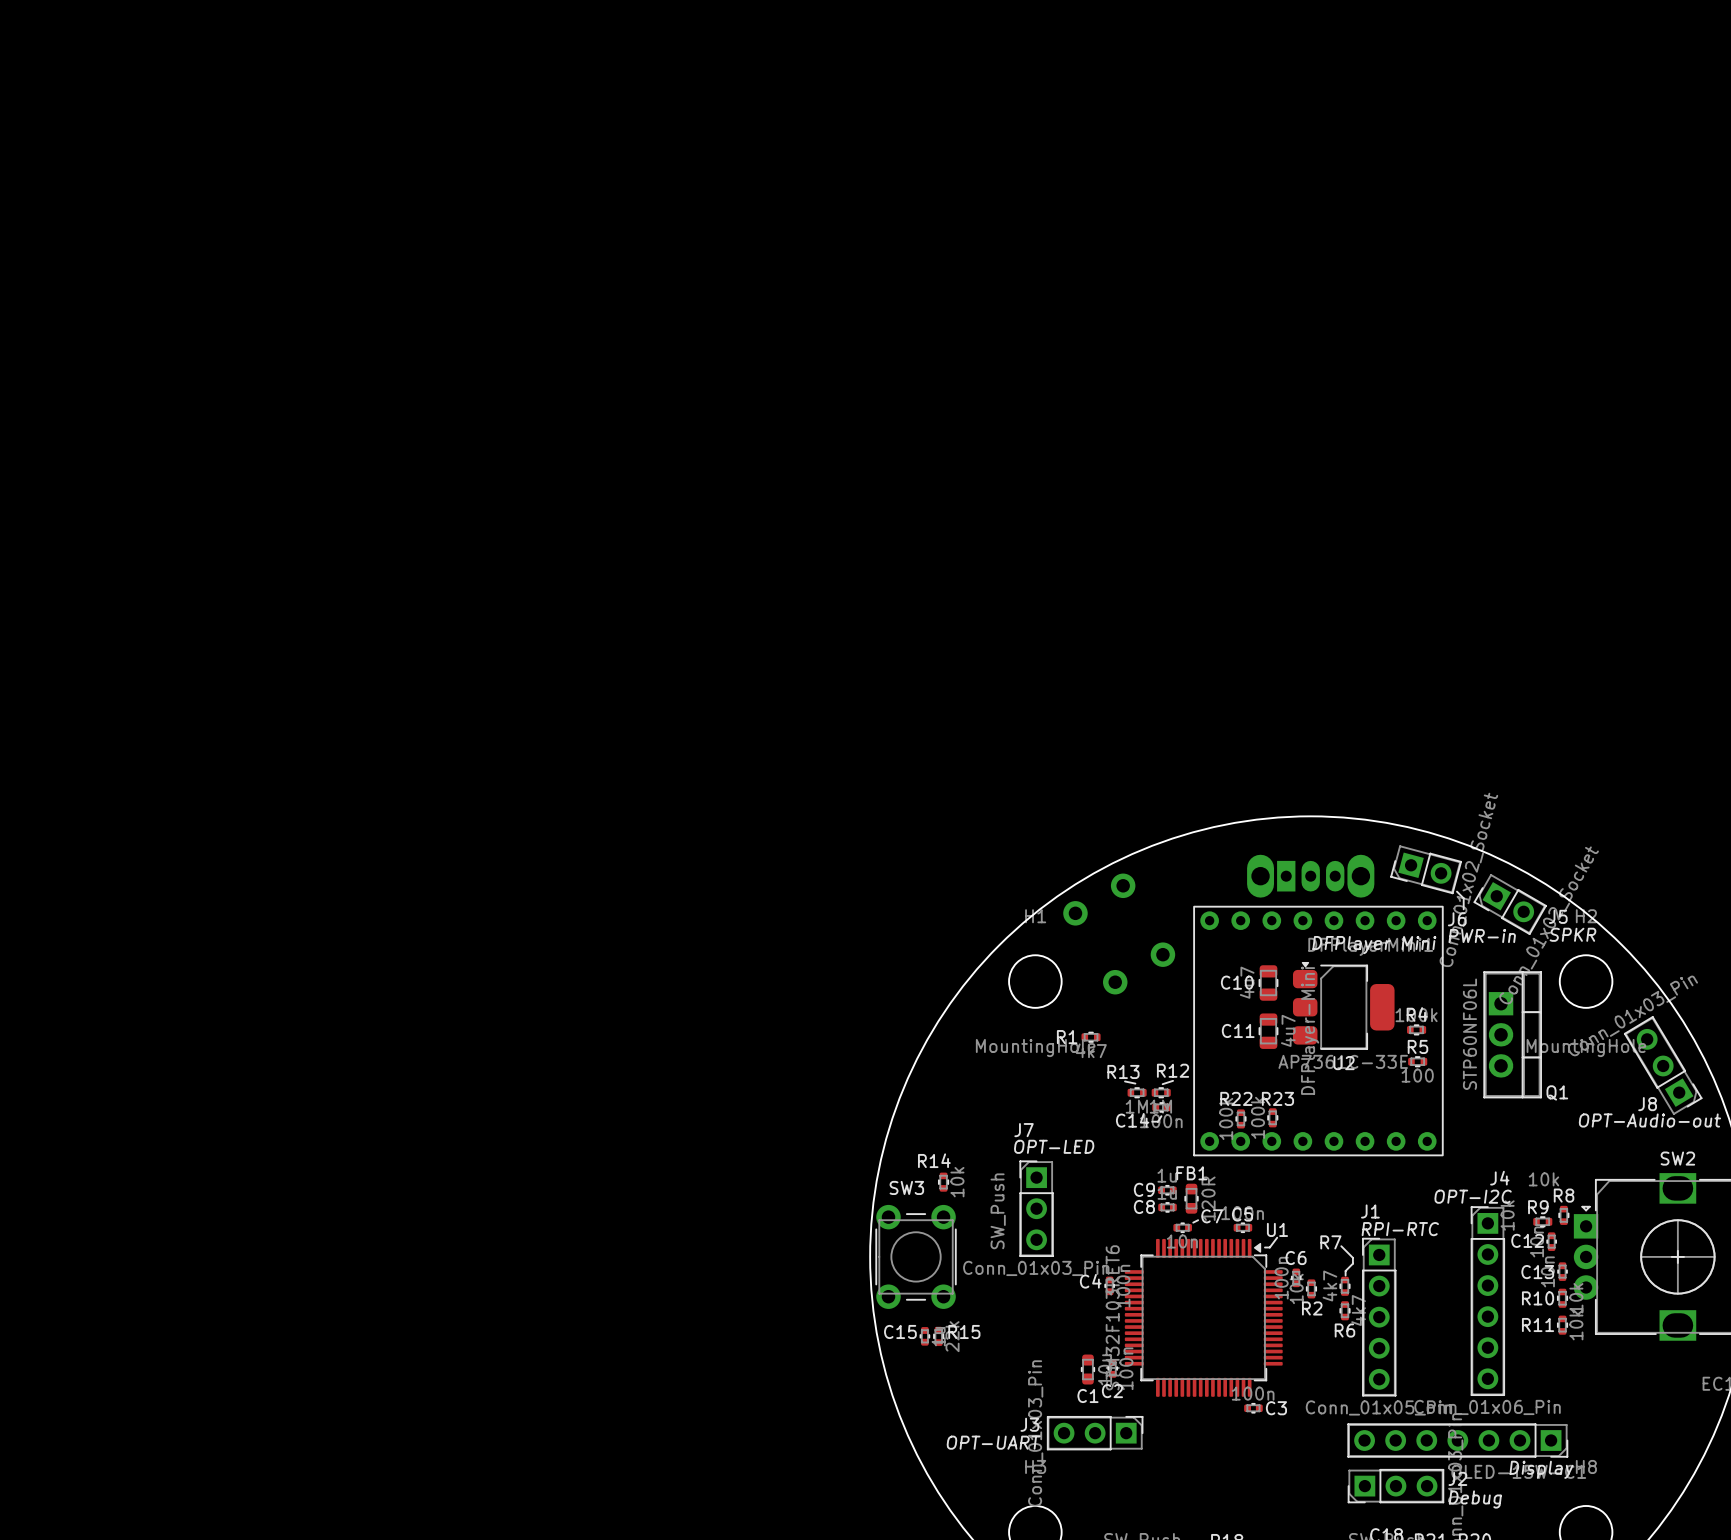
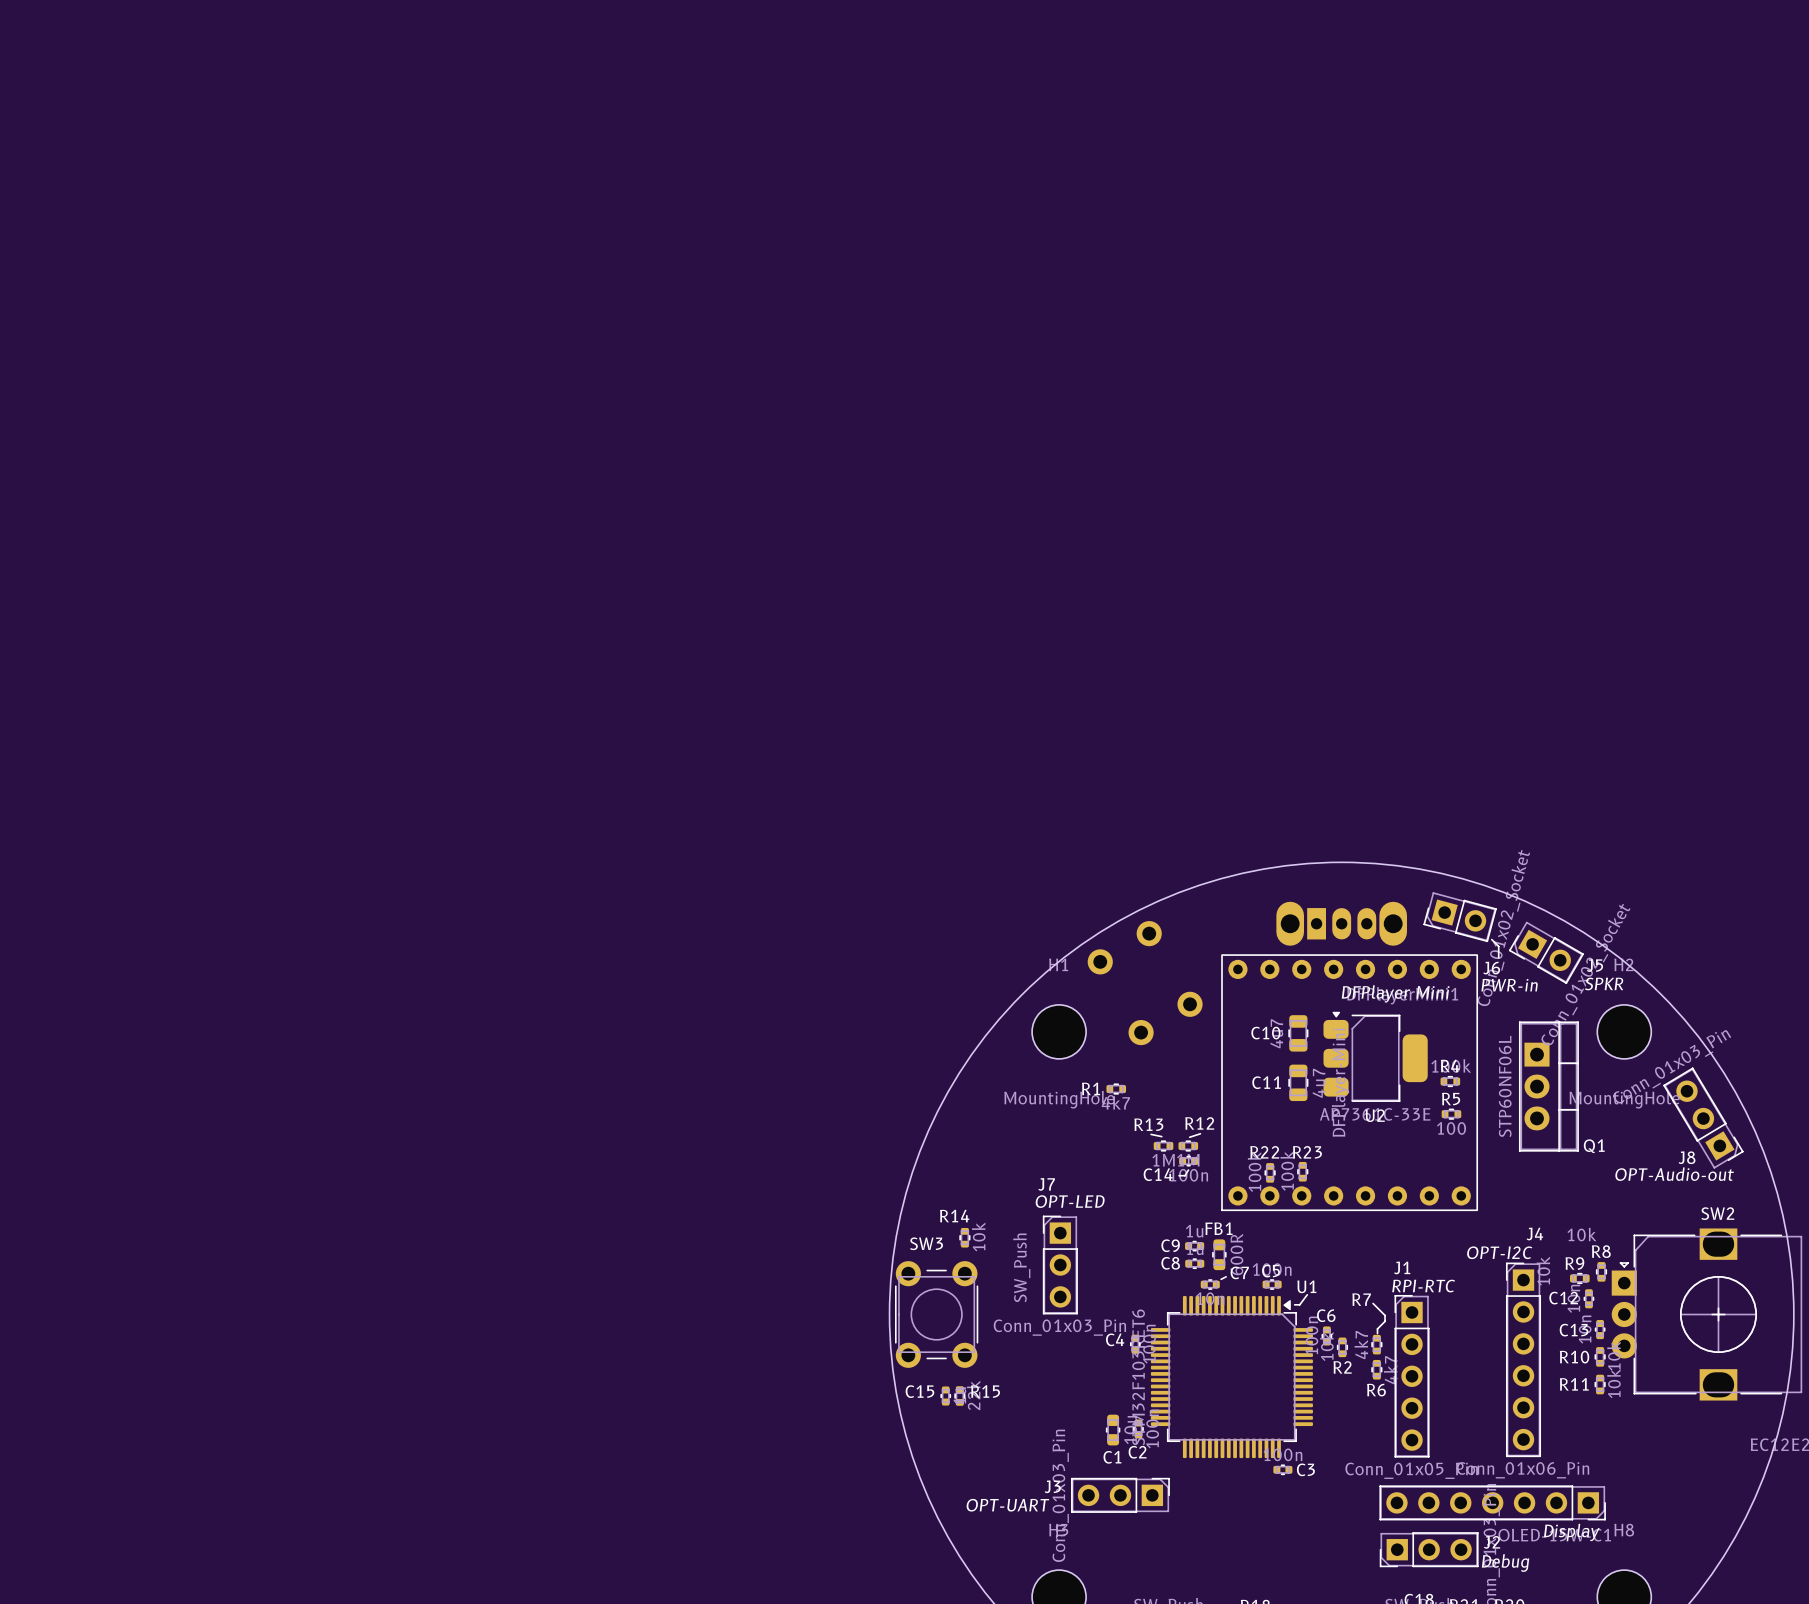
FB1 value: 120R (1208, 1198) -> 600R (1236, 1254)

